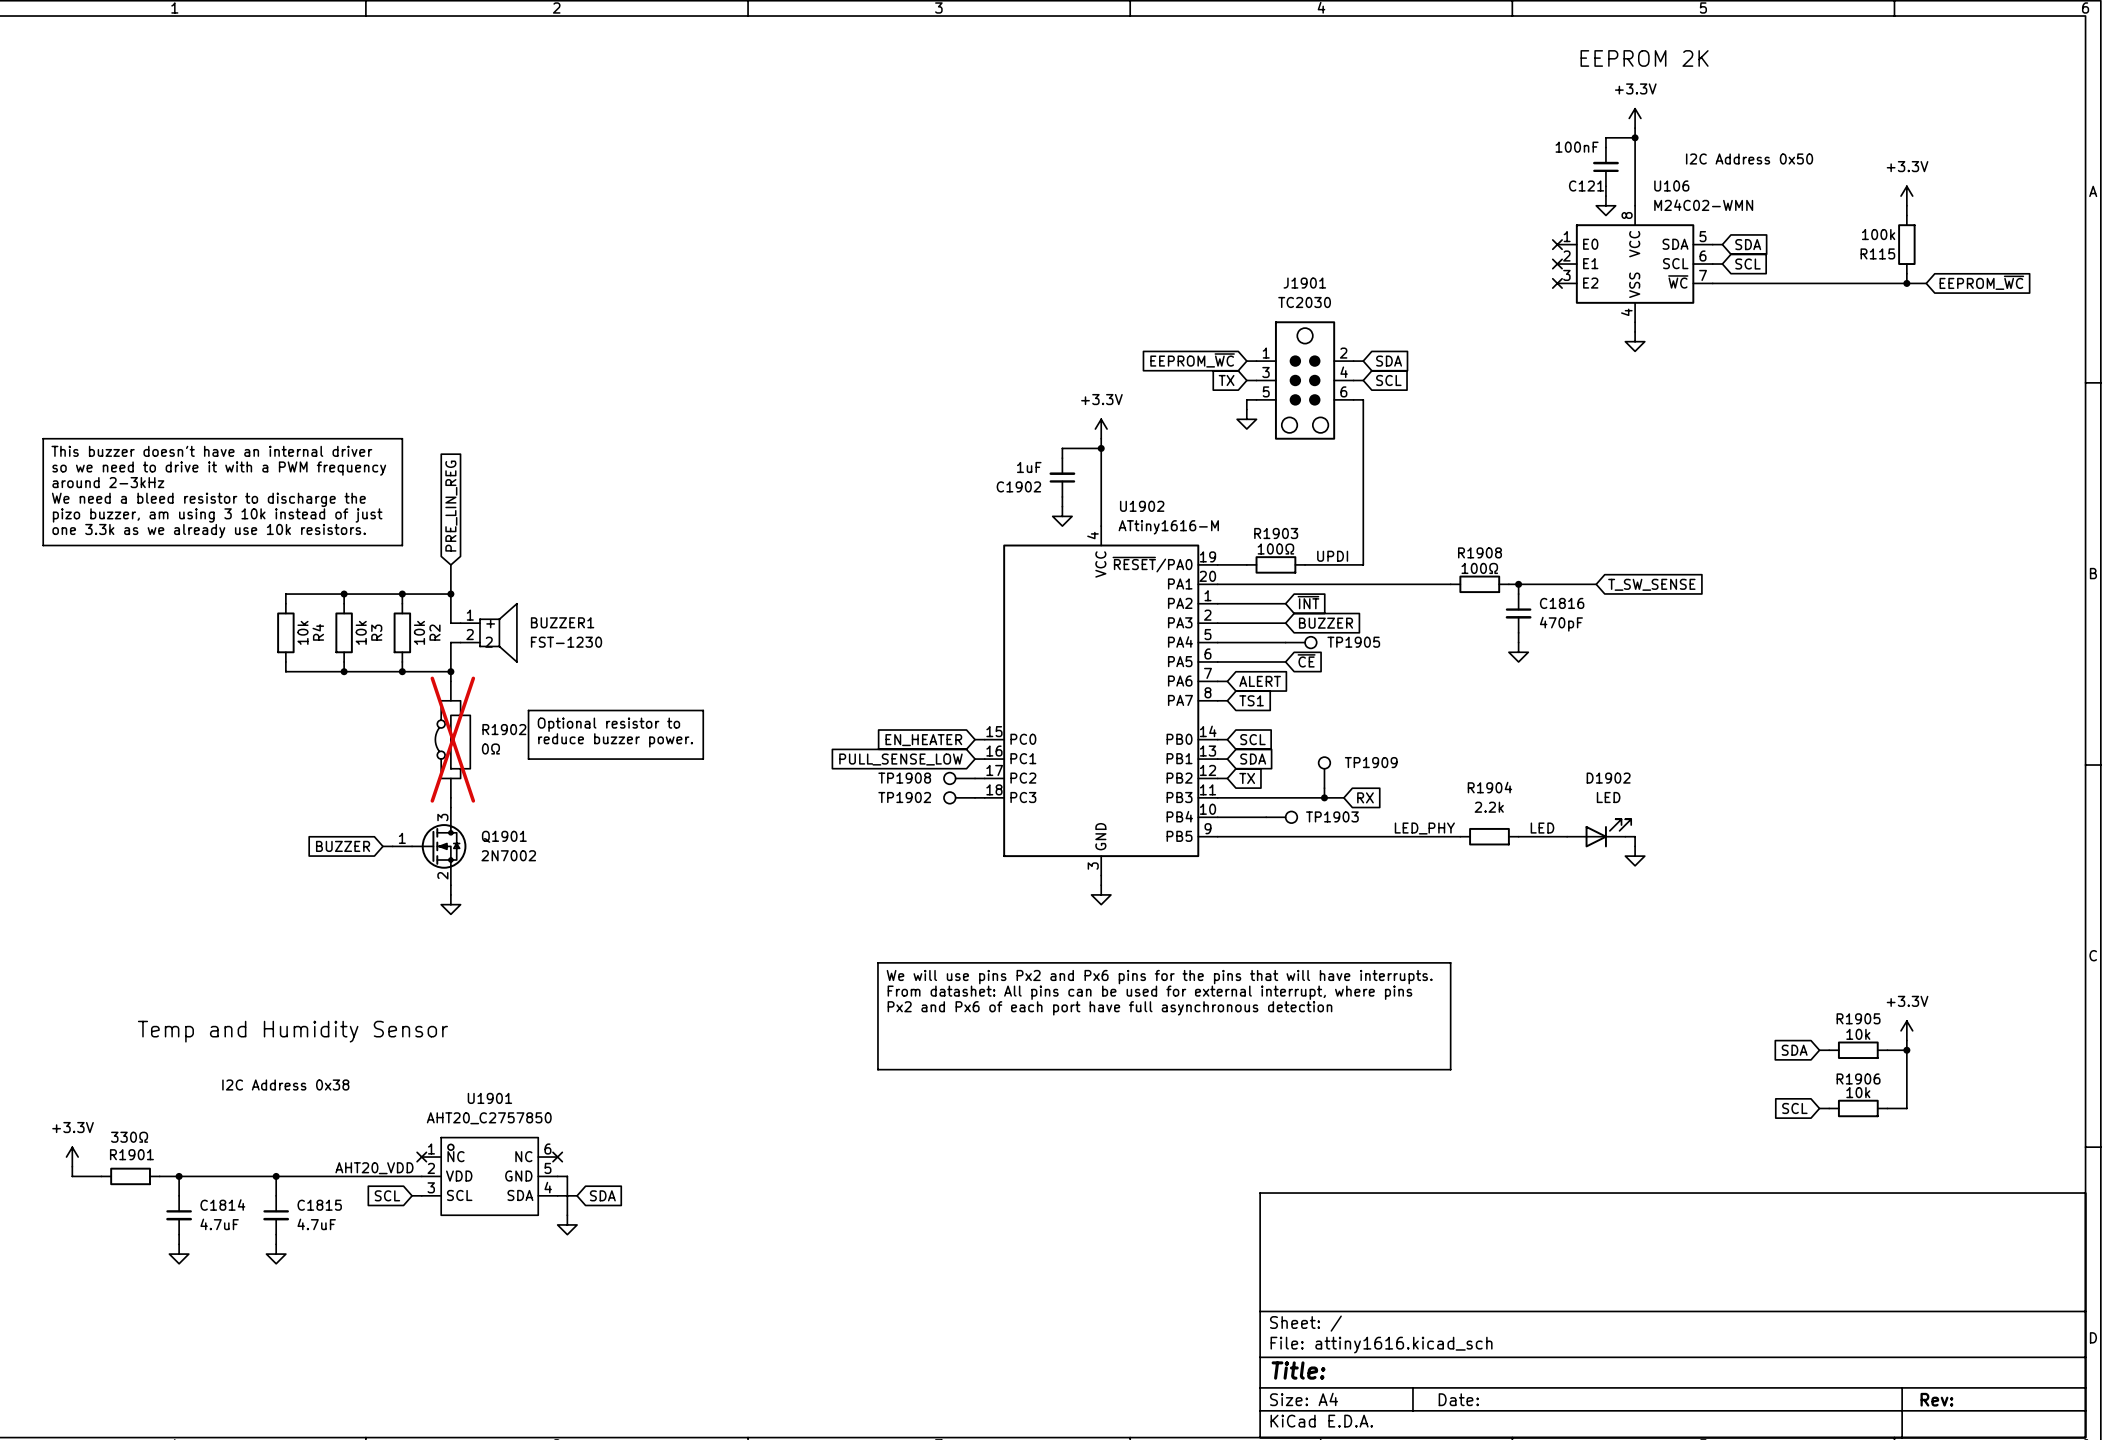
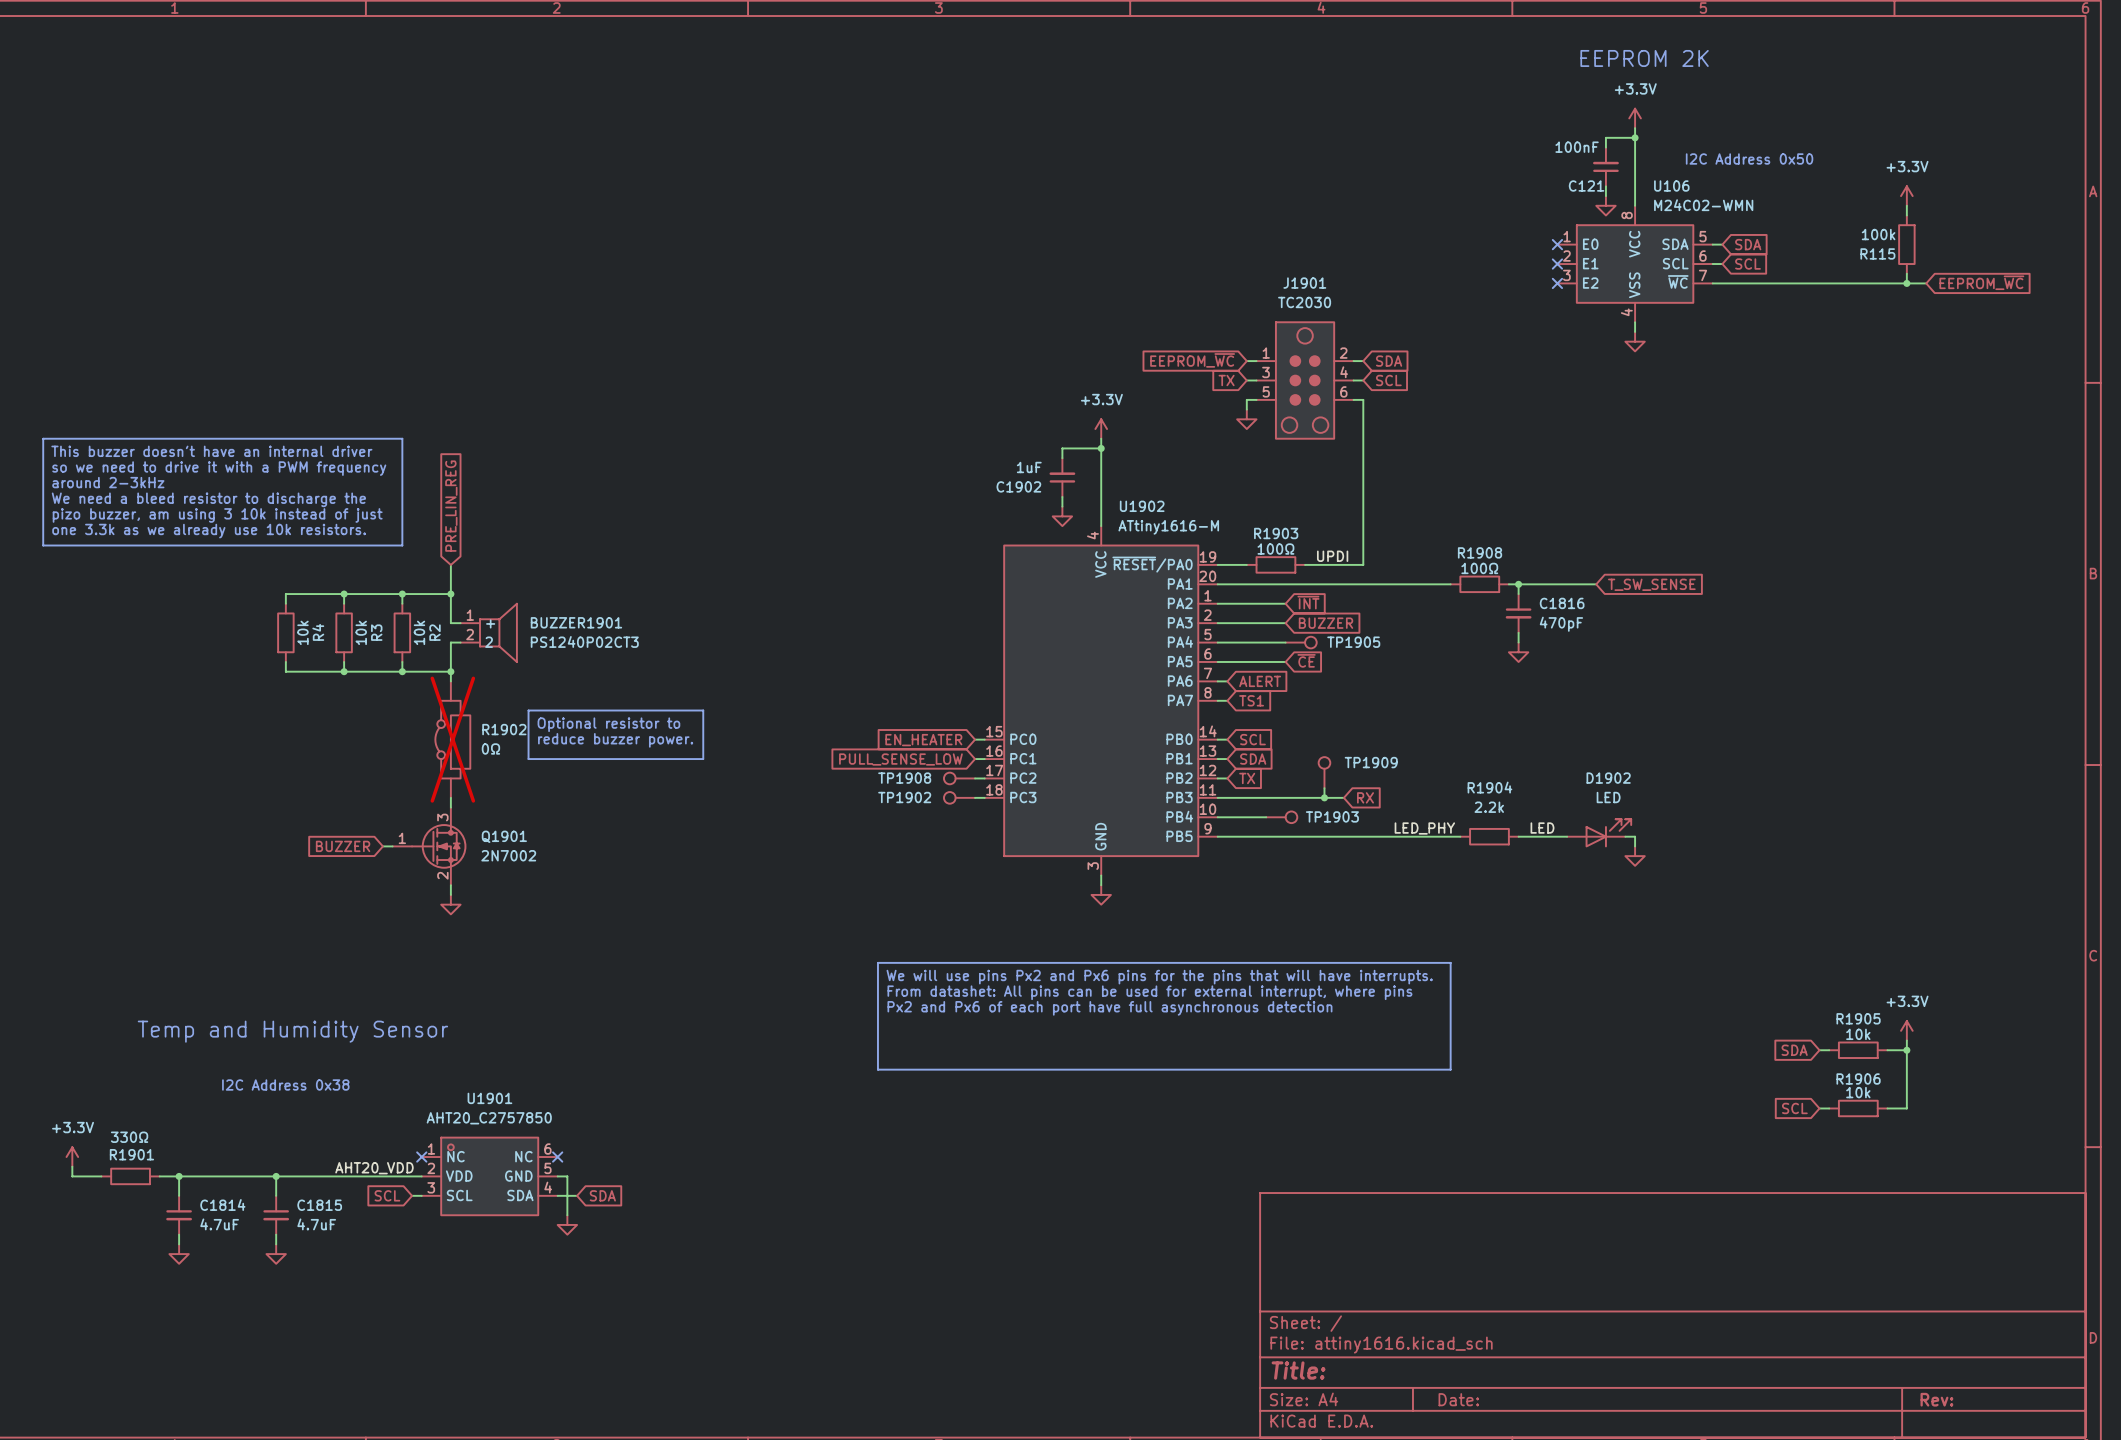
BUZZER1 name: BUZZER1 (562, 622) -> BUZZER1901 (576, 622)
BUZZER1 value: FST-1230 (566, 642) -> PS1240P02CT3 (584, 641)

